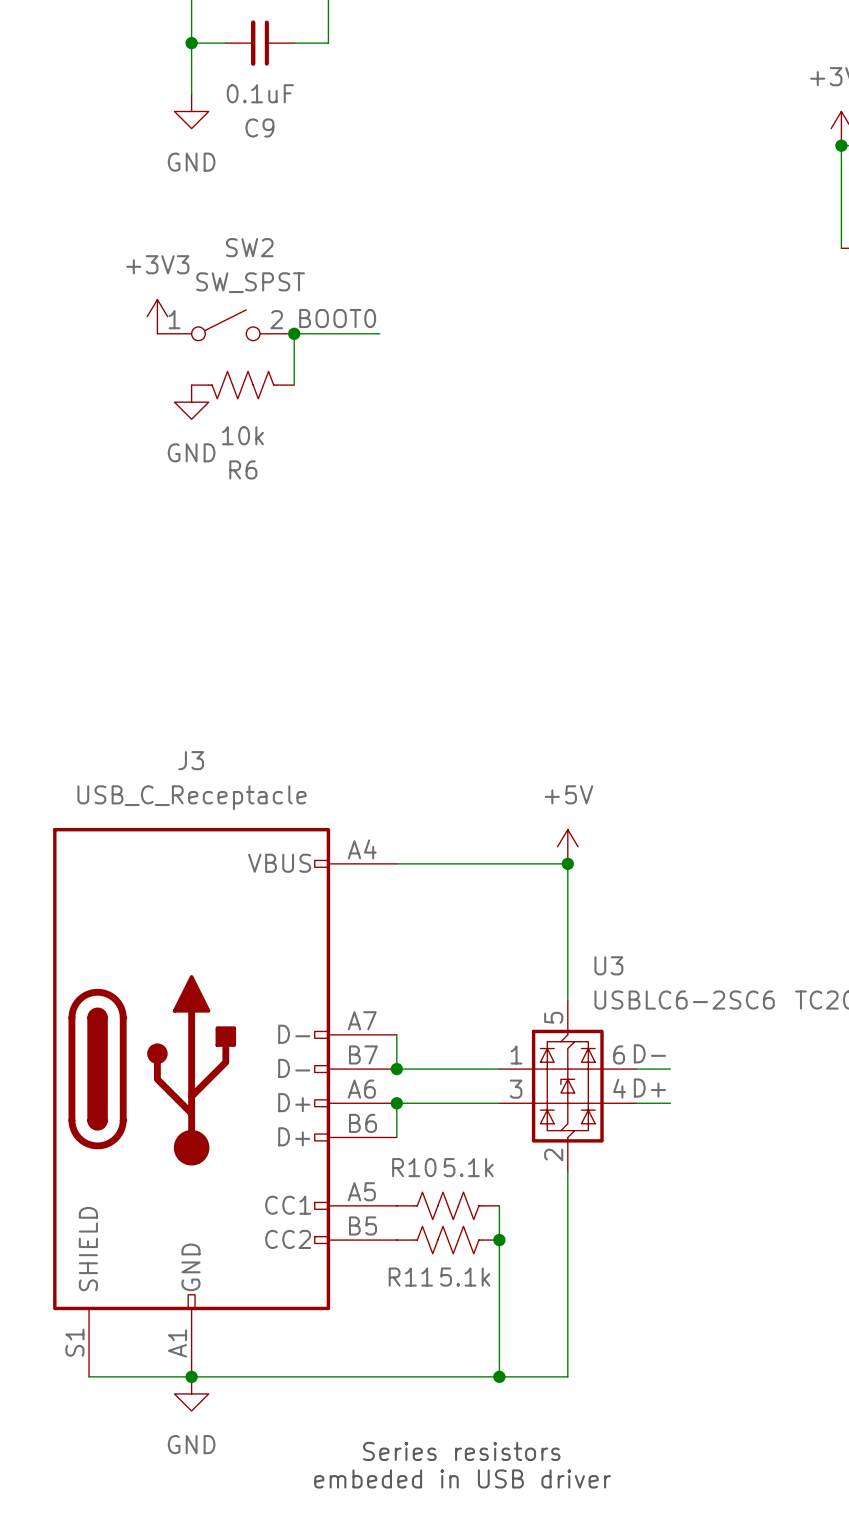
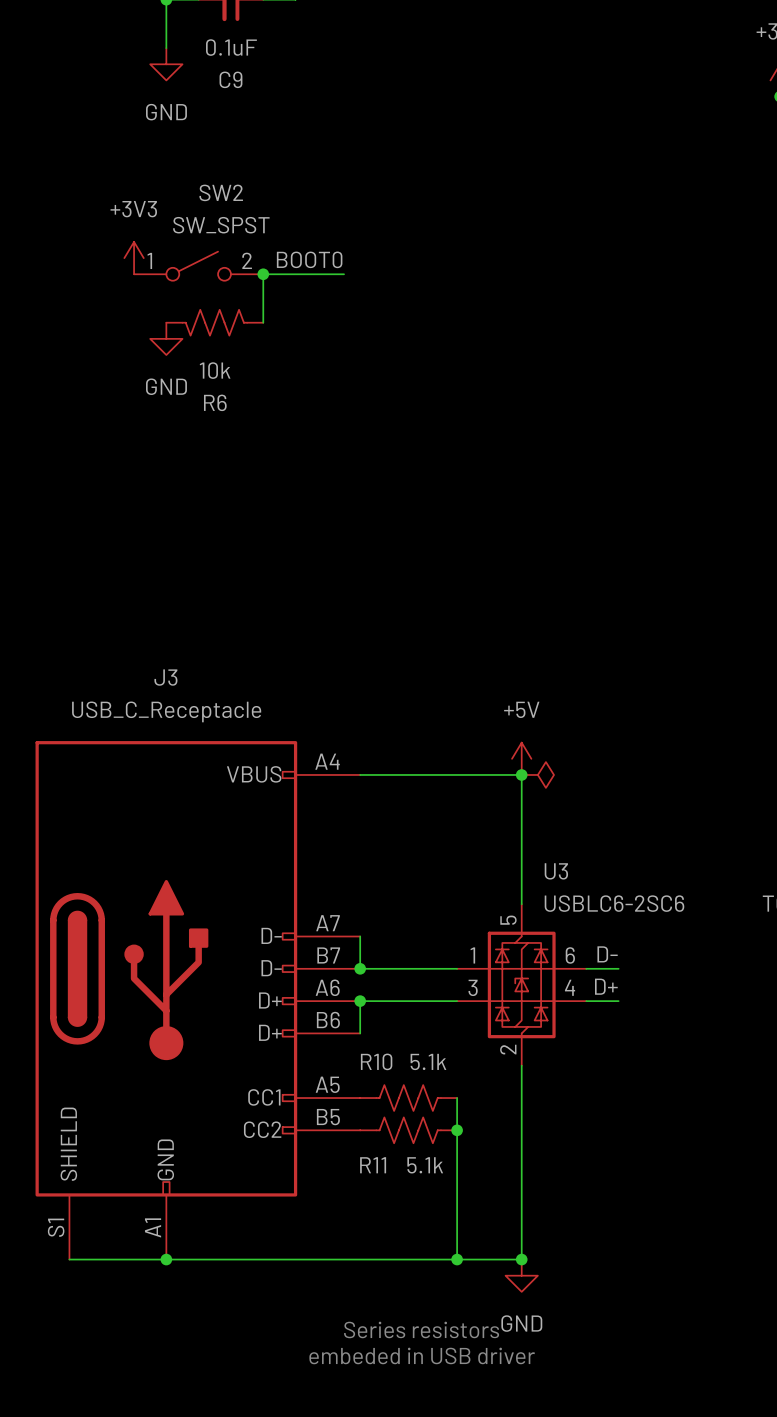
power symbol: none -> (537, 774)
junction: none -> (521, 1259)
power symbol: GND (191, 1393) -> none
power symbol: none -> GND (521, 1275)

